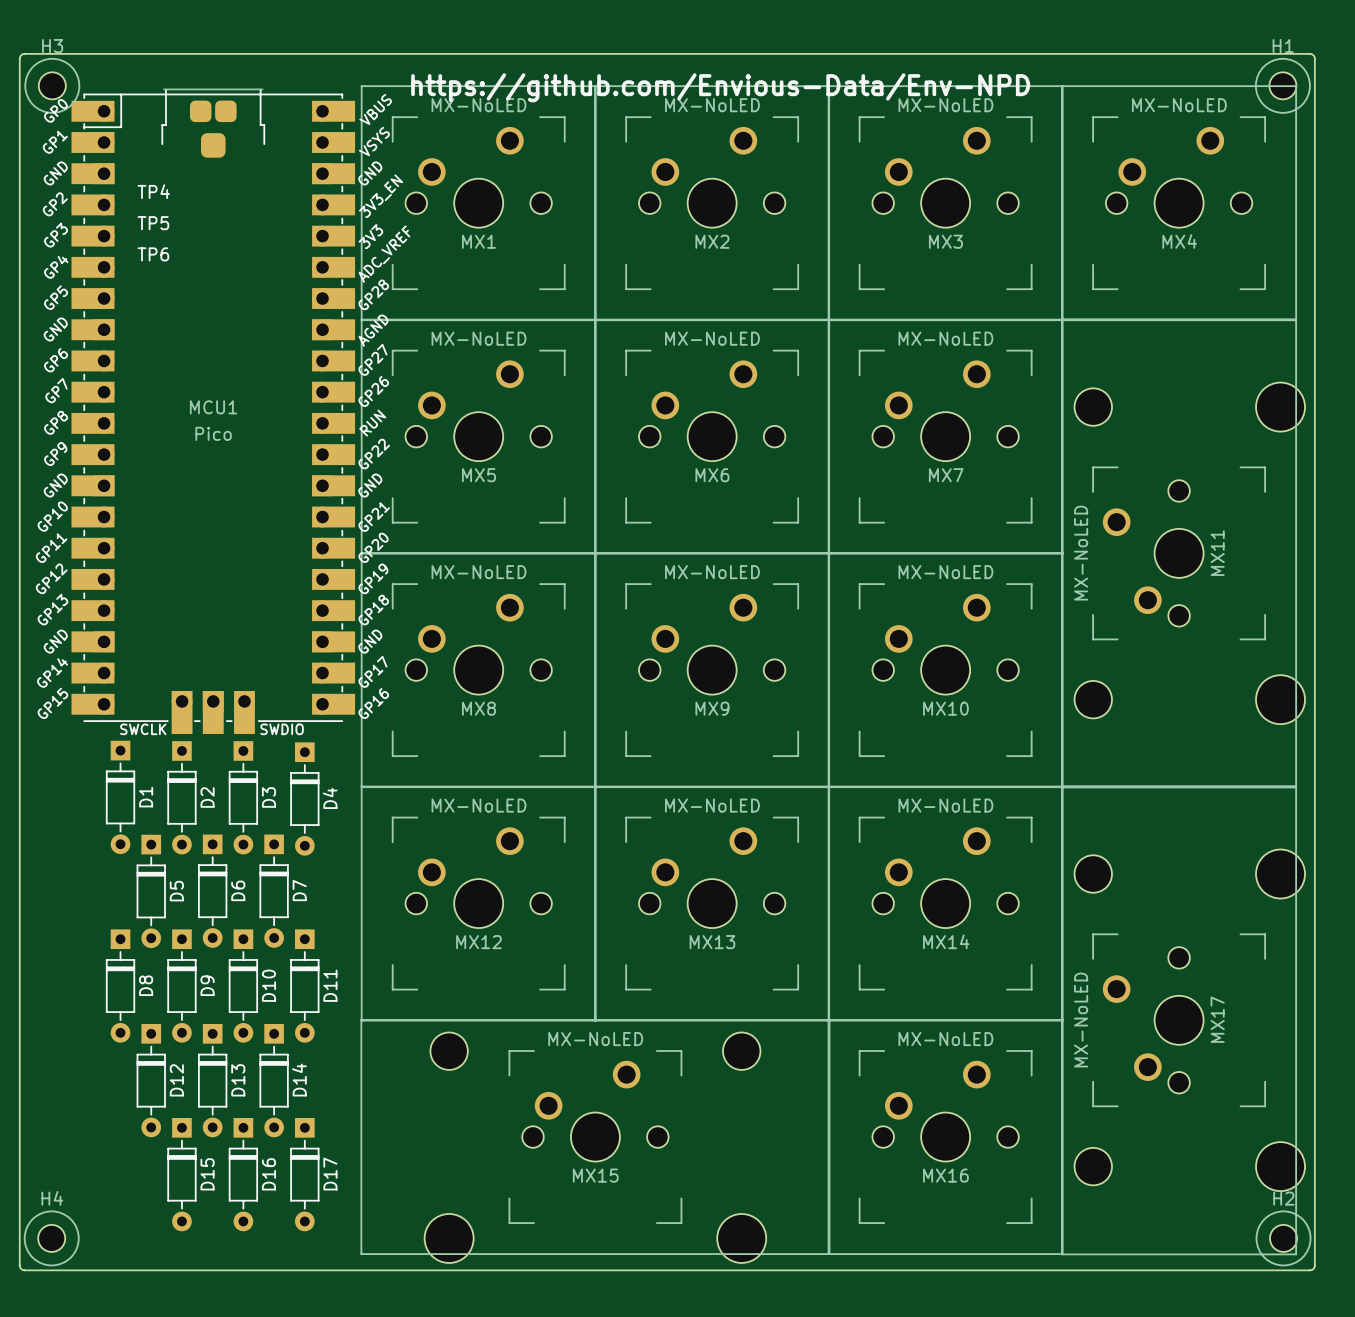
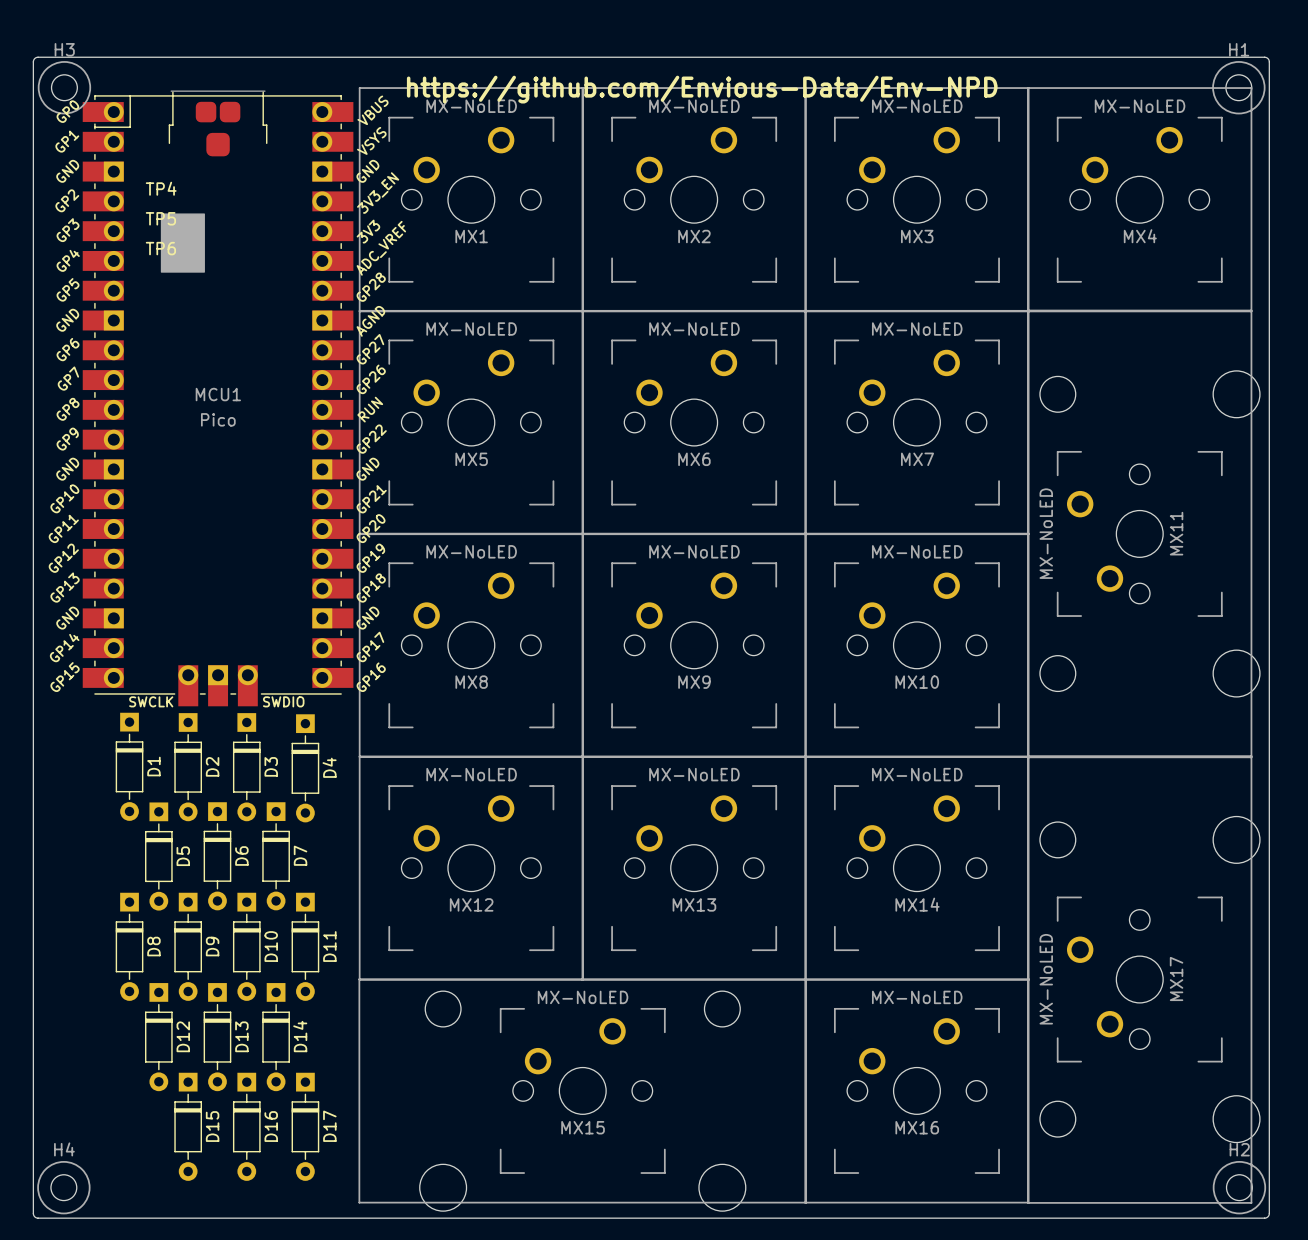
drawing: none -> [160, 213, 205, 273]

